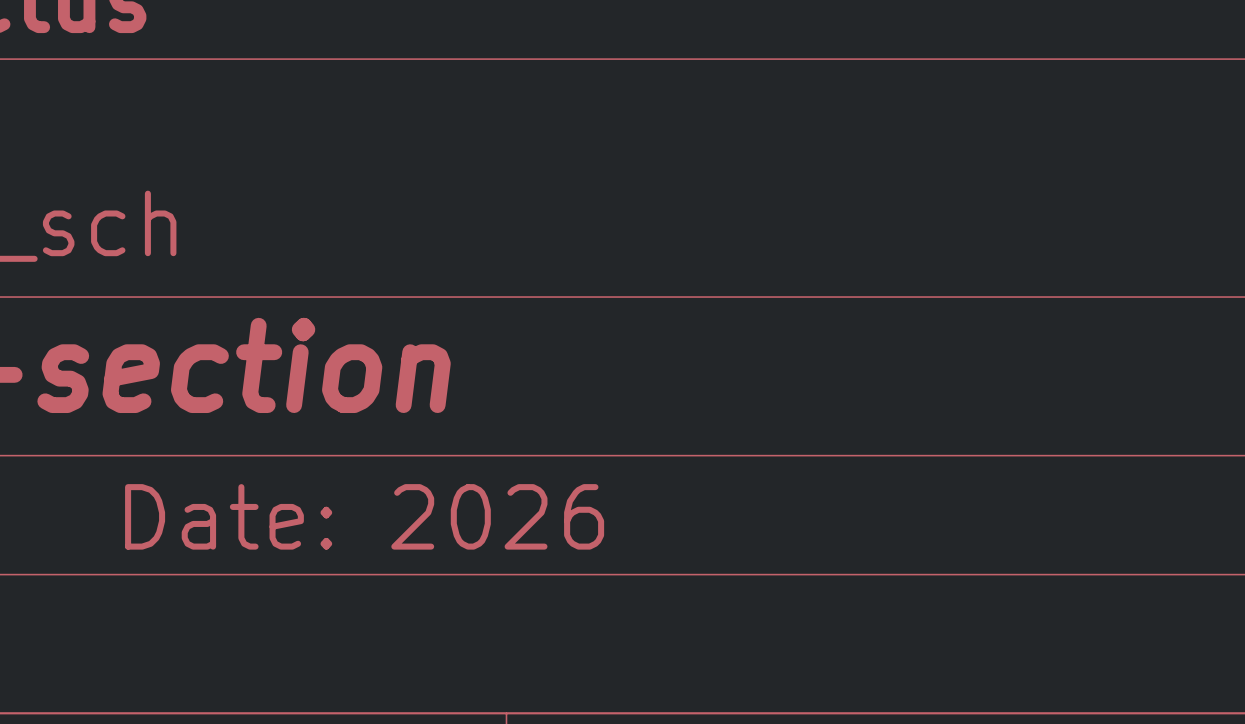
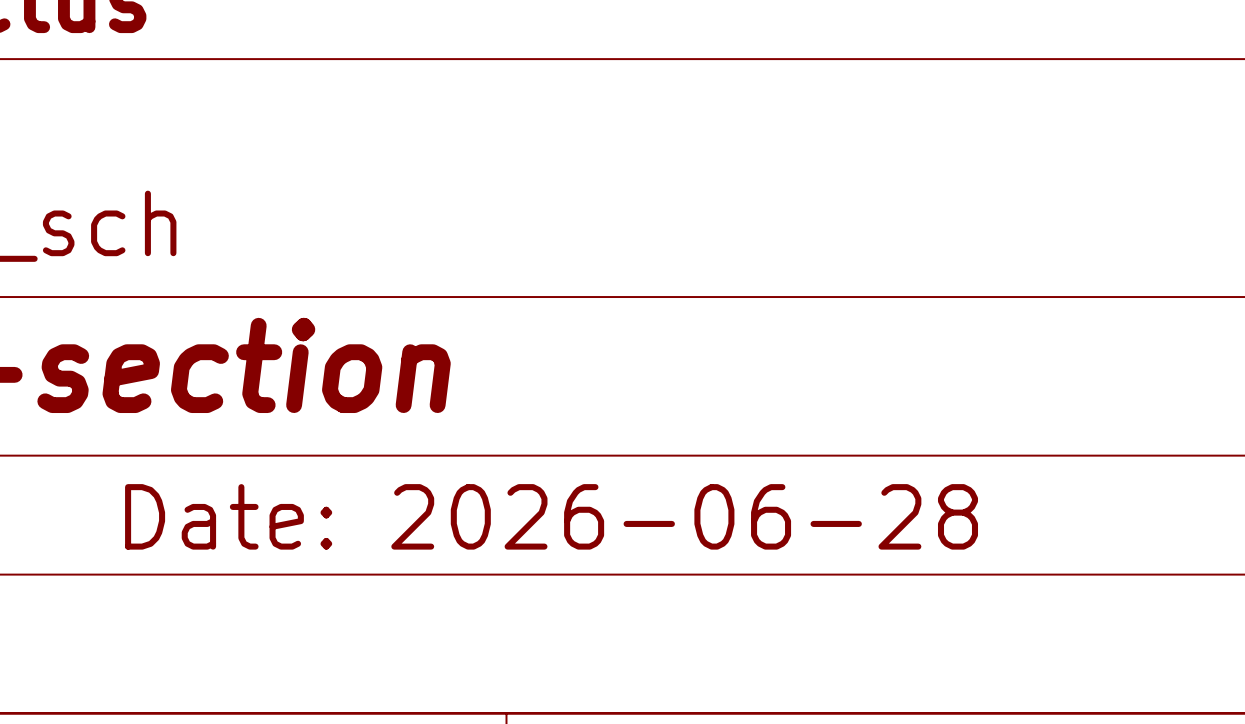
title block: Date: 2026 (364, 516) -> Date: 2026-06-28 (551, 516)

